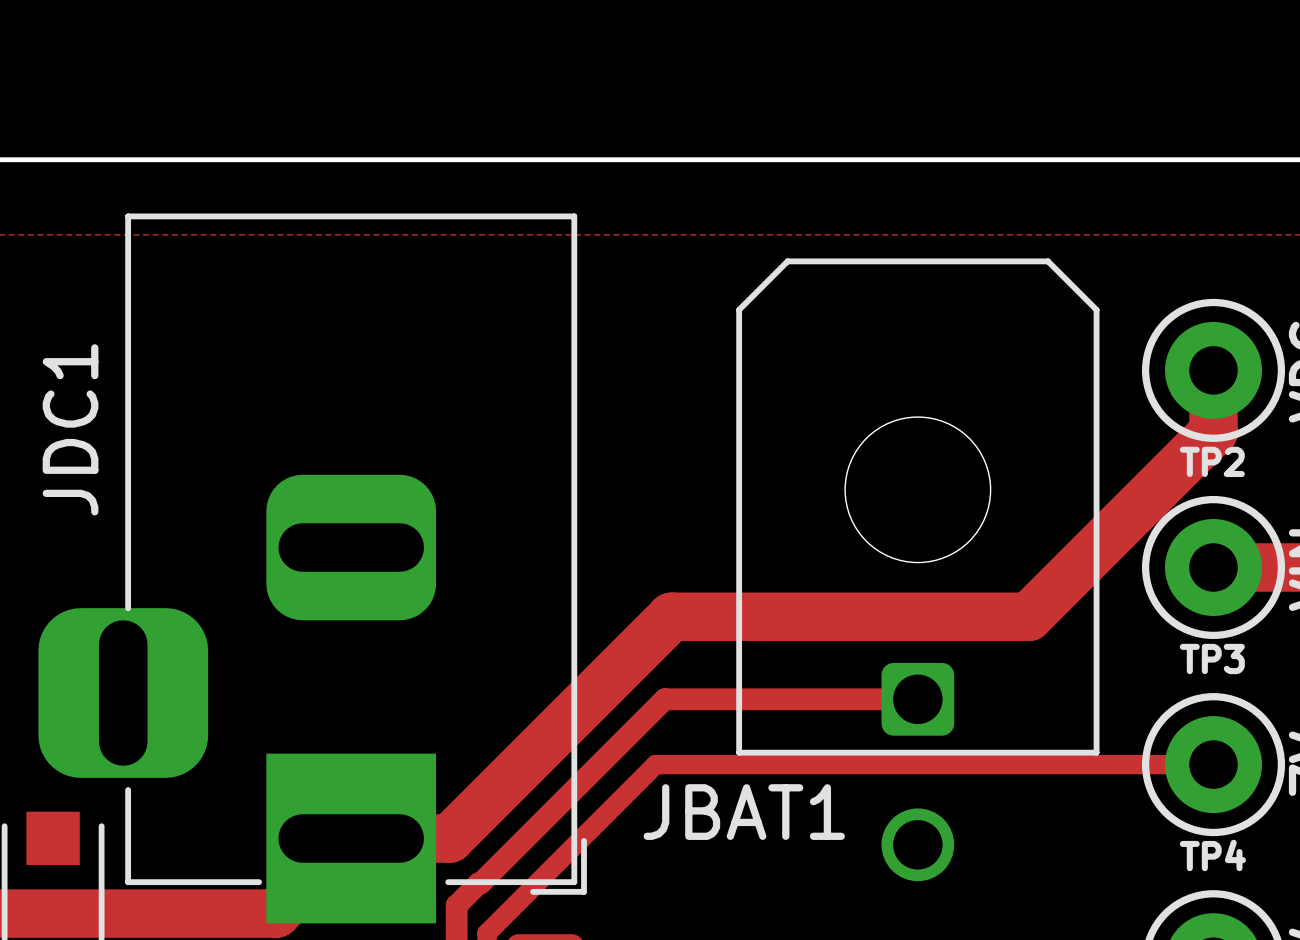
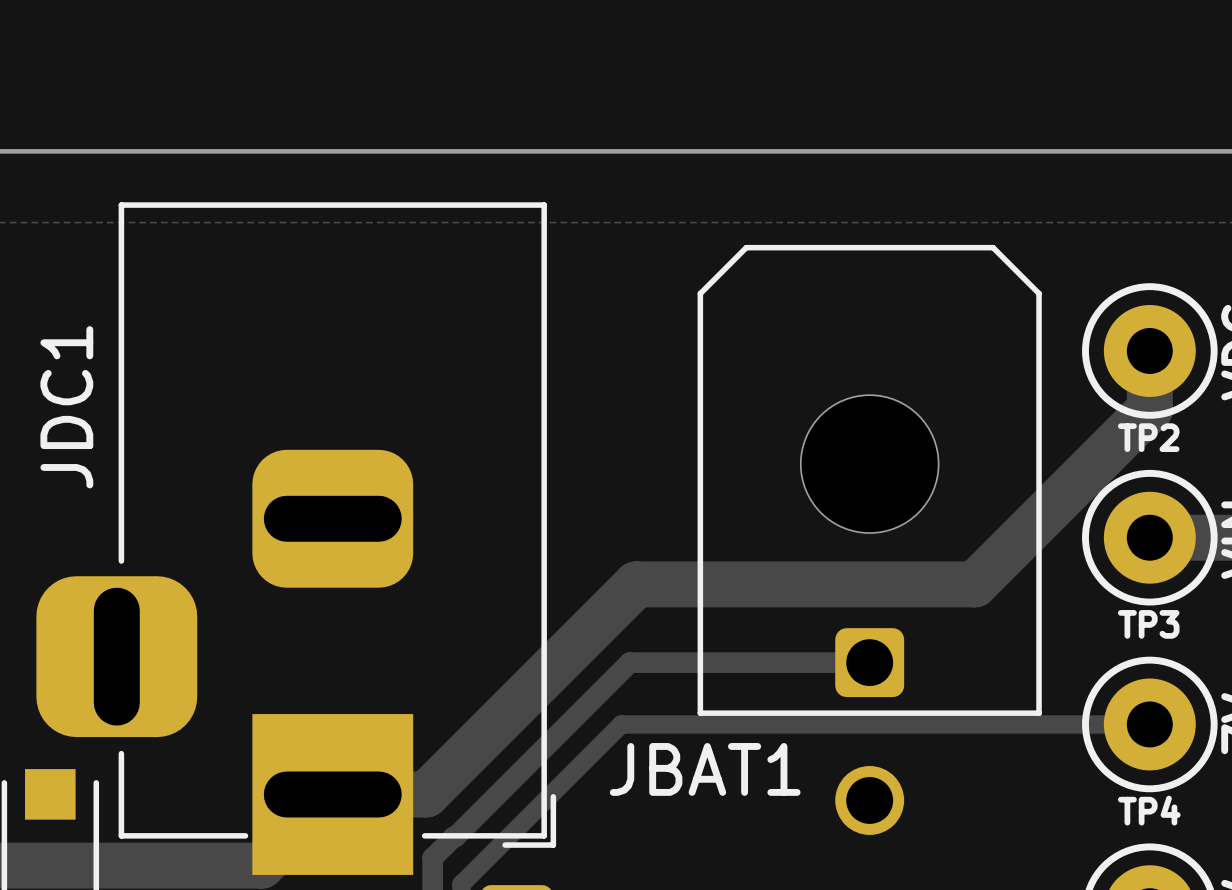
JDC1 footprint: [38, 213, 587, 924] -> [36, 202, 557, 875]

